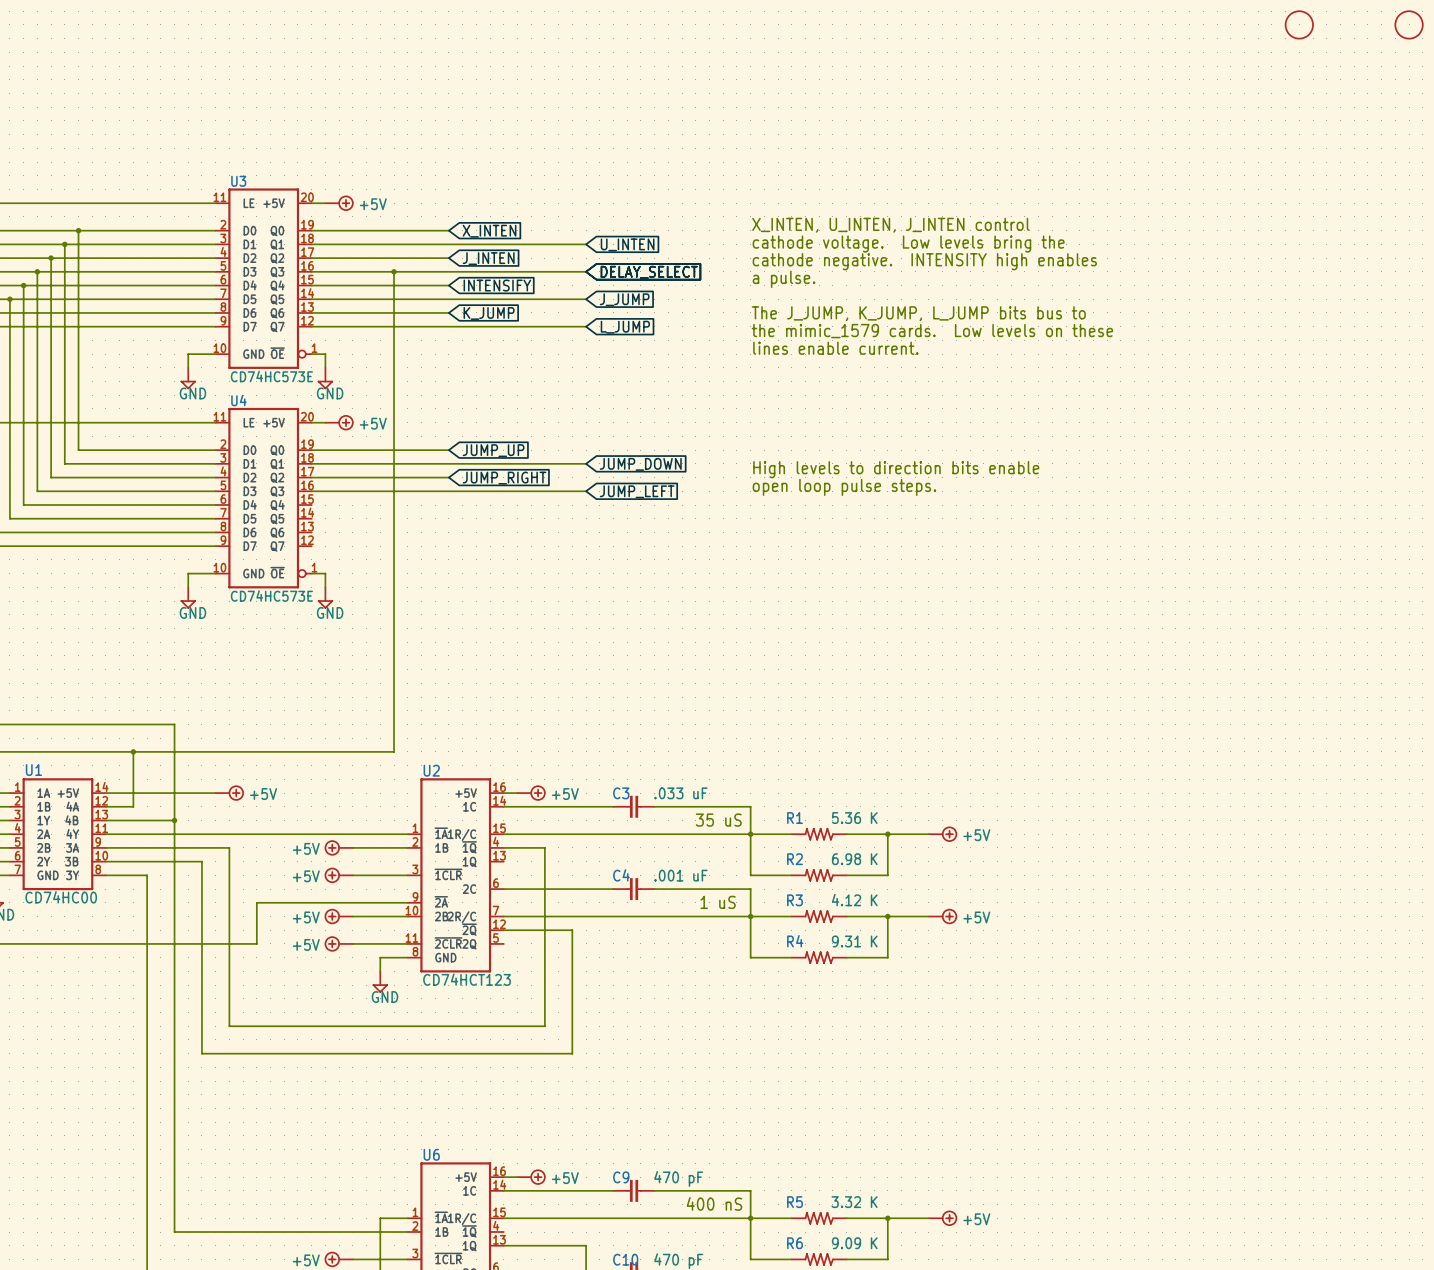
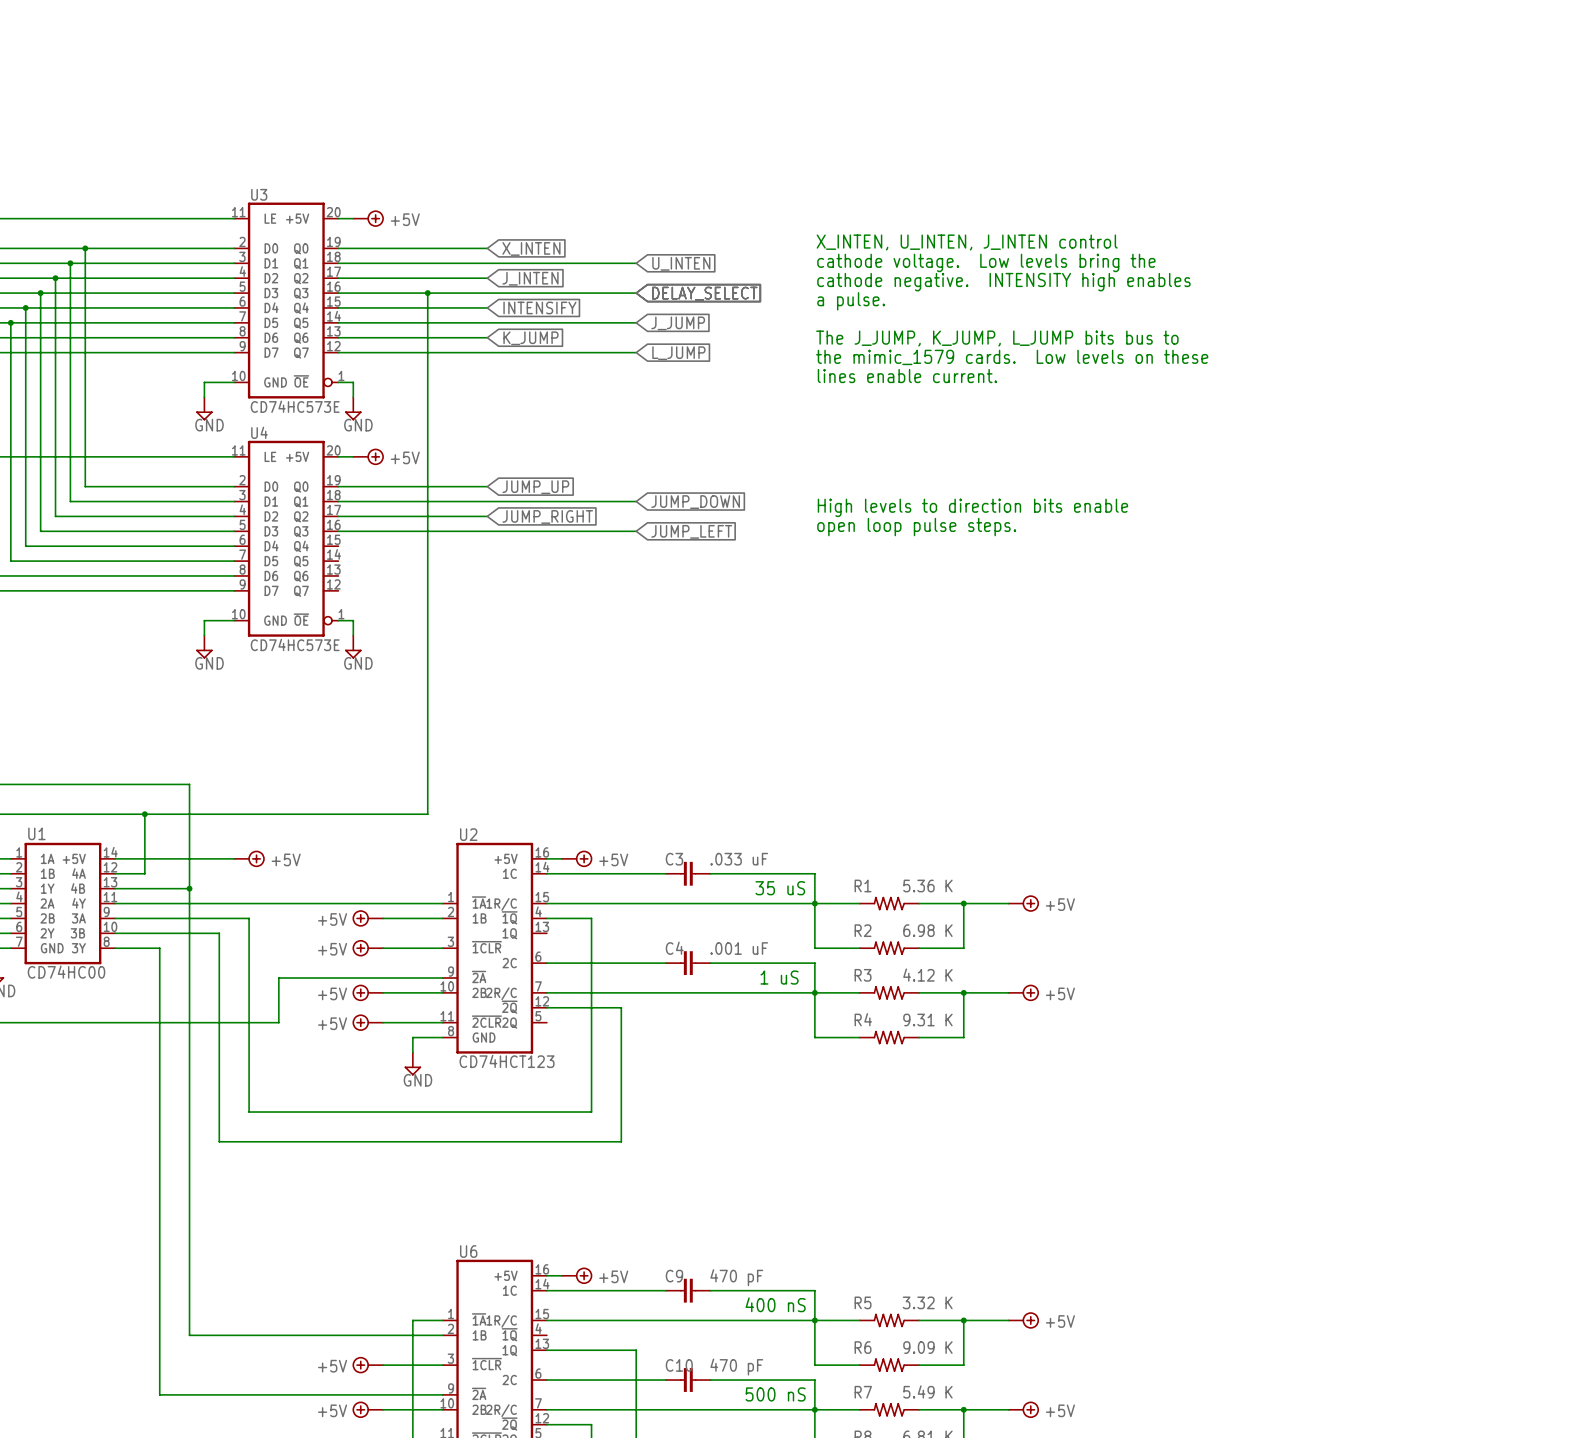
part: (1299, 24) -> none
part: (1409, 24) -> none

